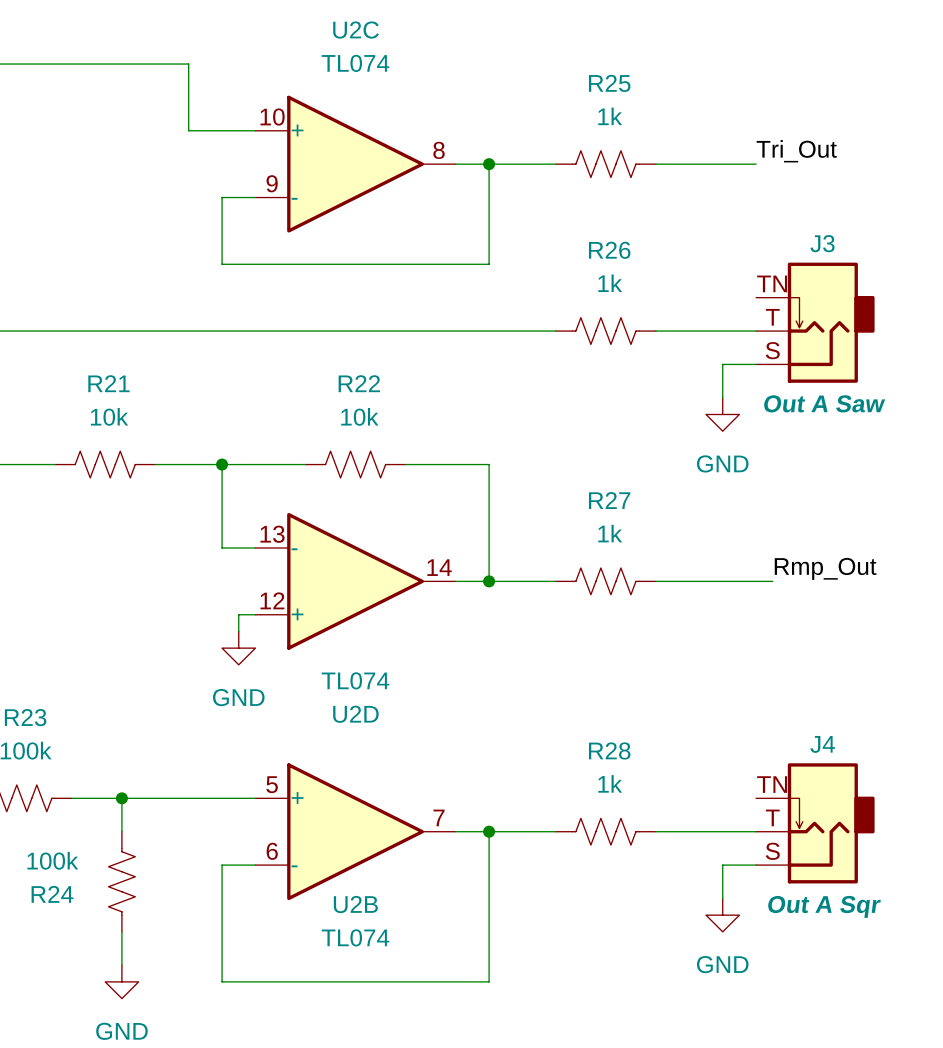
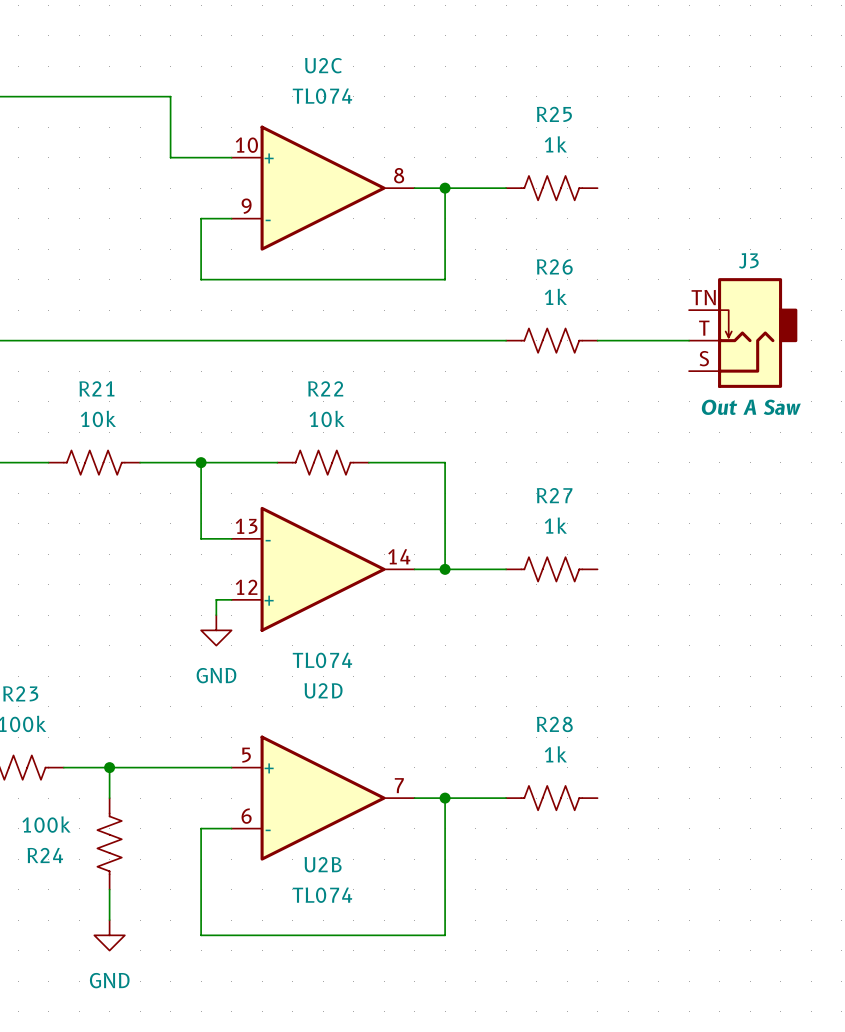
label: Tri_Out (796, 151) -> none
wire: (655, 164) (756, 164) -> none
wire: (756, 364) (722, 364) (722, 397) -> none
power symbol: GND (722, 414) -> none
label: Rmp_Out (825, 568) -> none
wire: (655, 581) (772, 581) -> none
J4: (815, 823) -> none
wire: (655, 831) (756, 831) -> none
wire: (756, 865) (722, 865) (722, 898) -> none
power symbol: GND (722, 915) -> none

